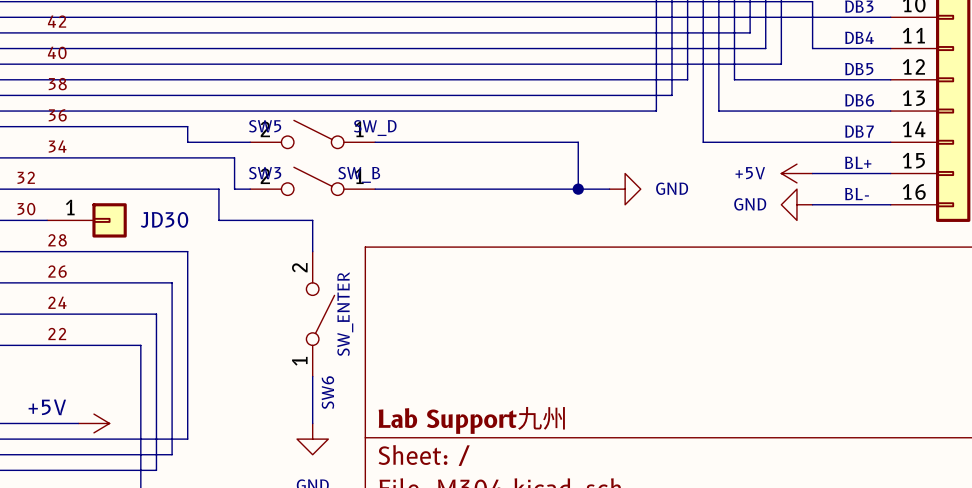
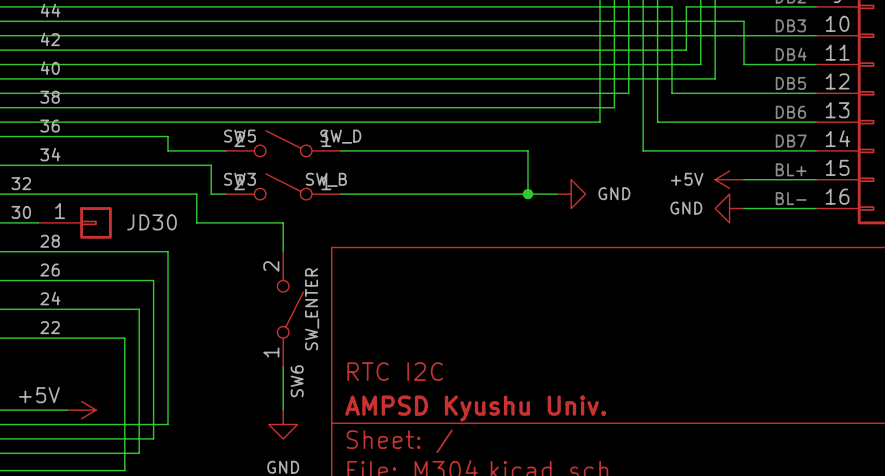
title block: none -> RTC I2C (395, 371)
title block: Lab Support九州 (471, 420) -> AMPSD Kyushu Univ. (475, 408)

